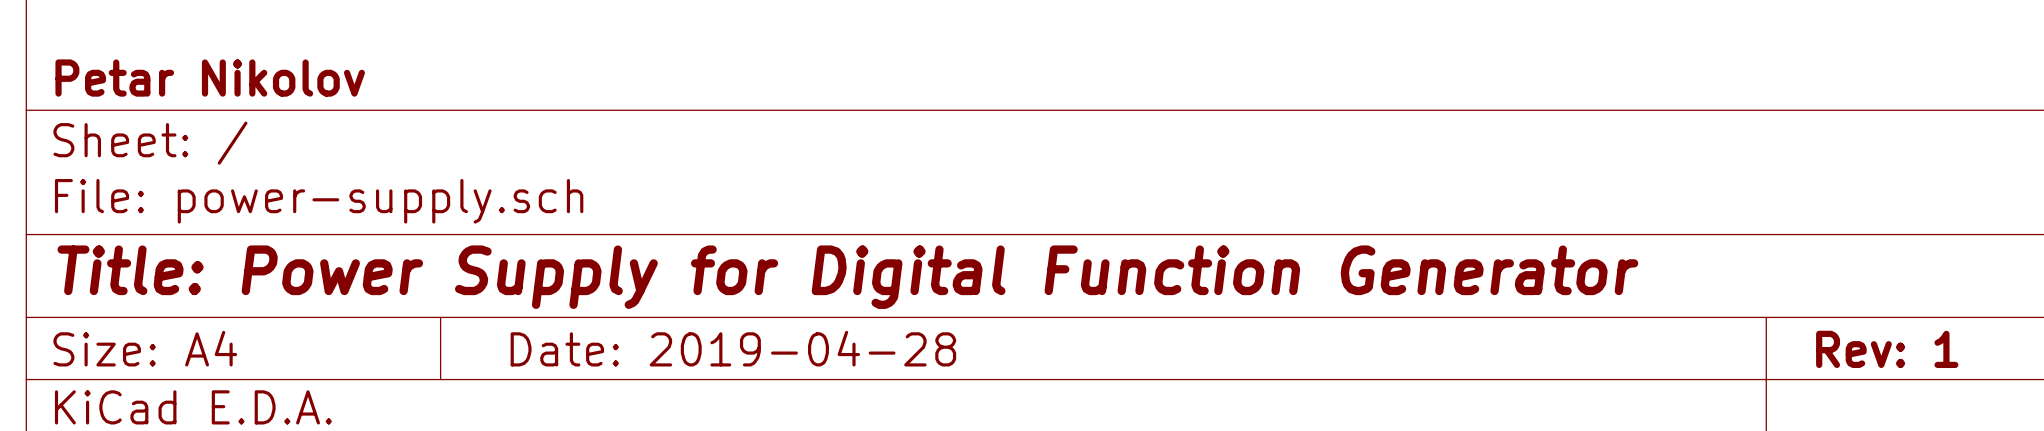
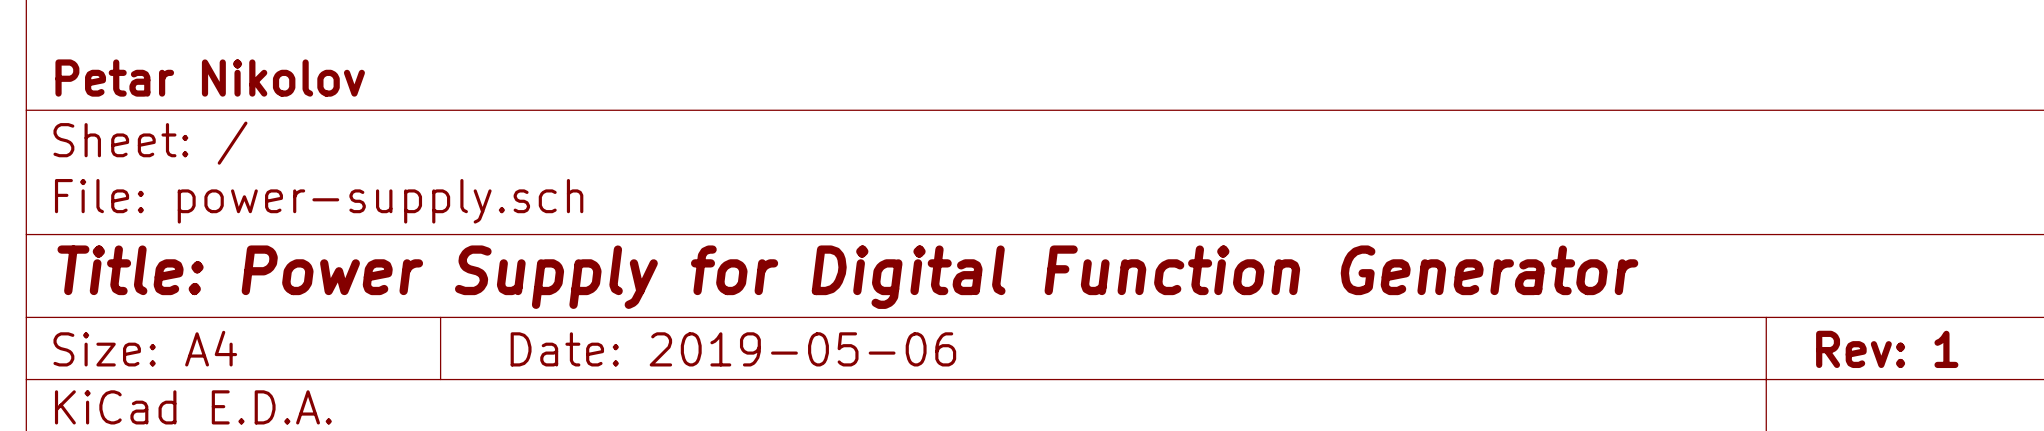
title block: Date: 2019-04-28 (733, 348) -> Date: 2019-05-06 (733, 349)

